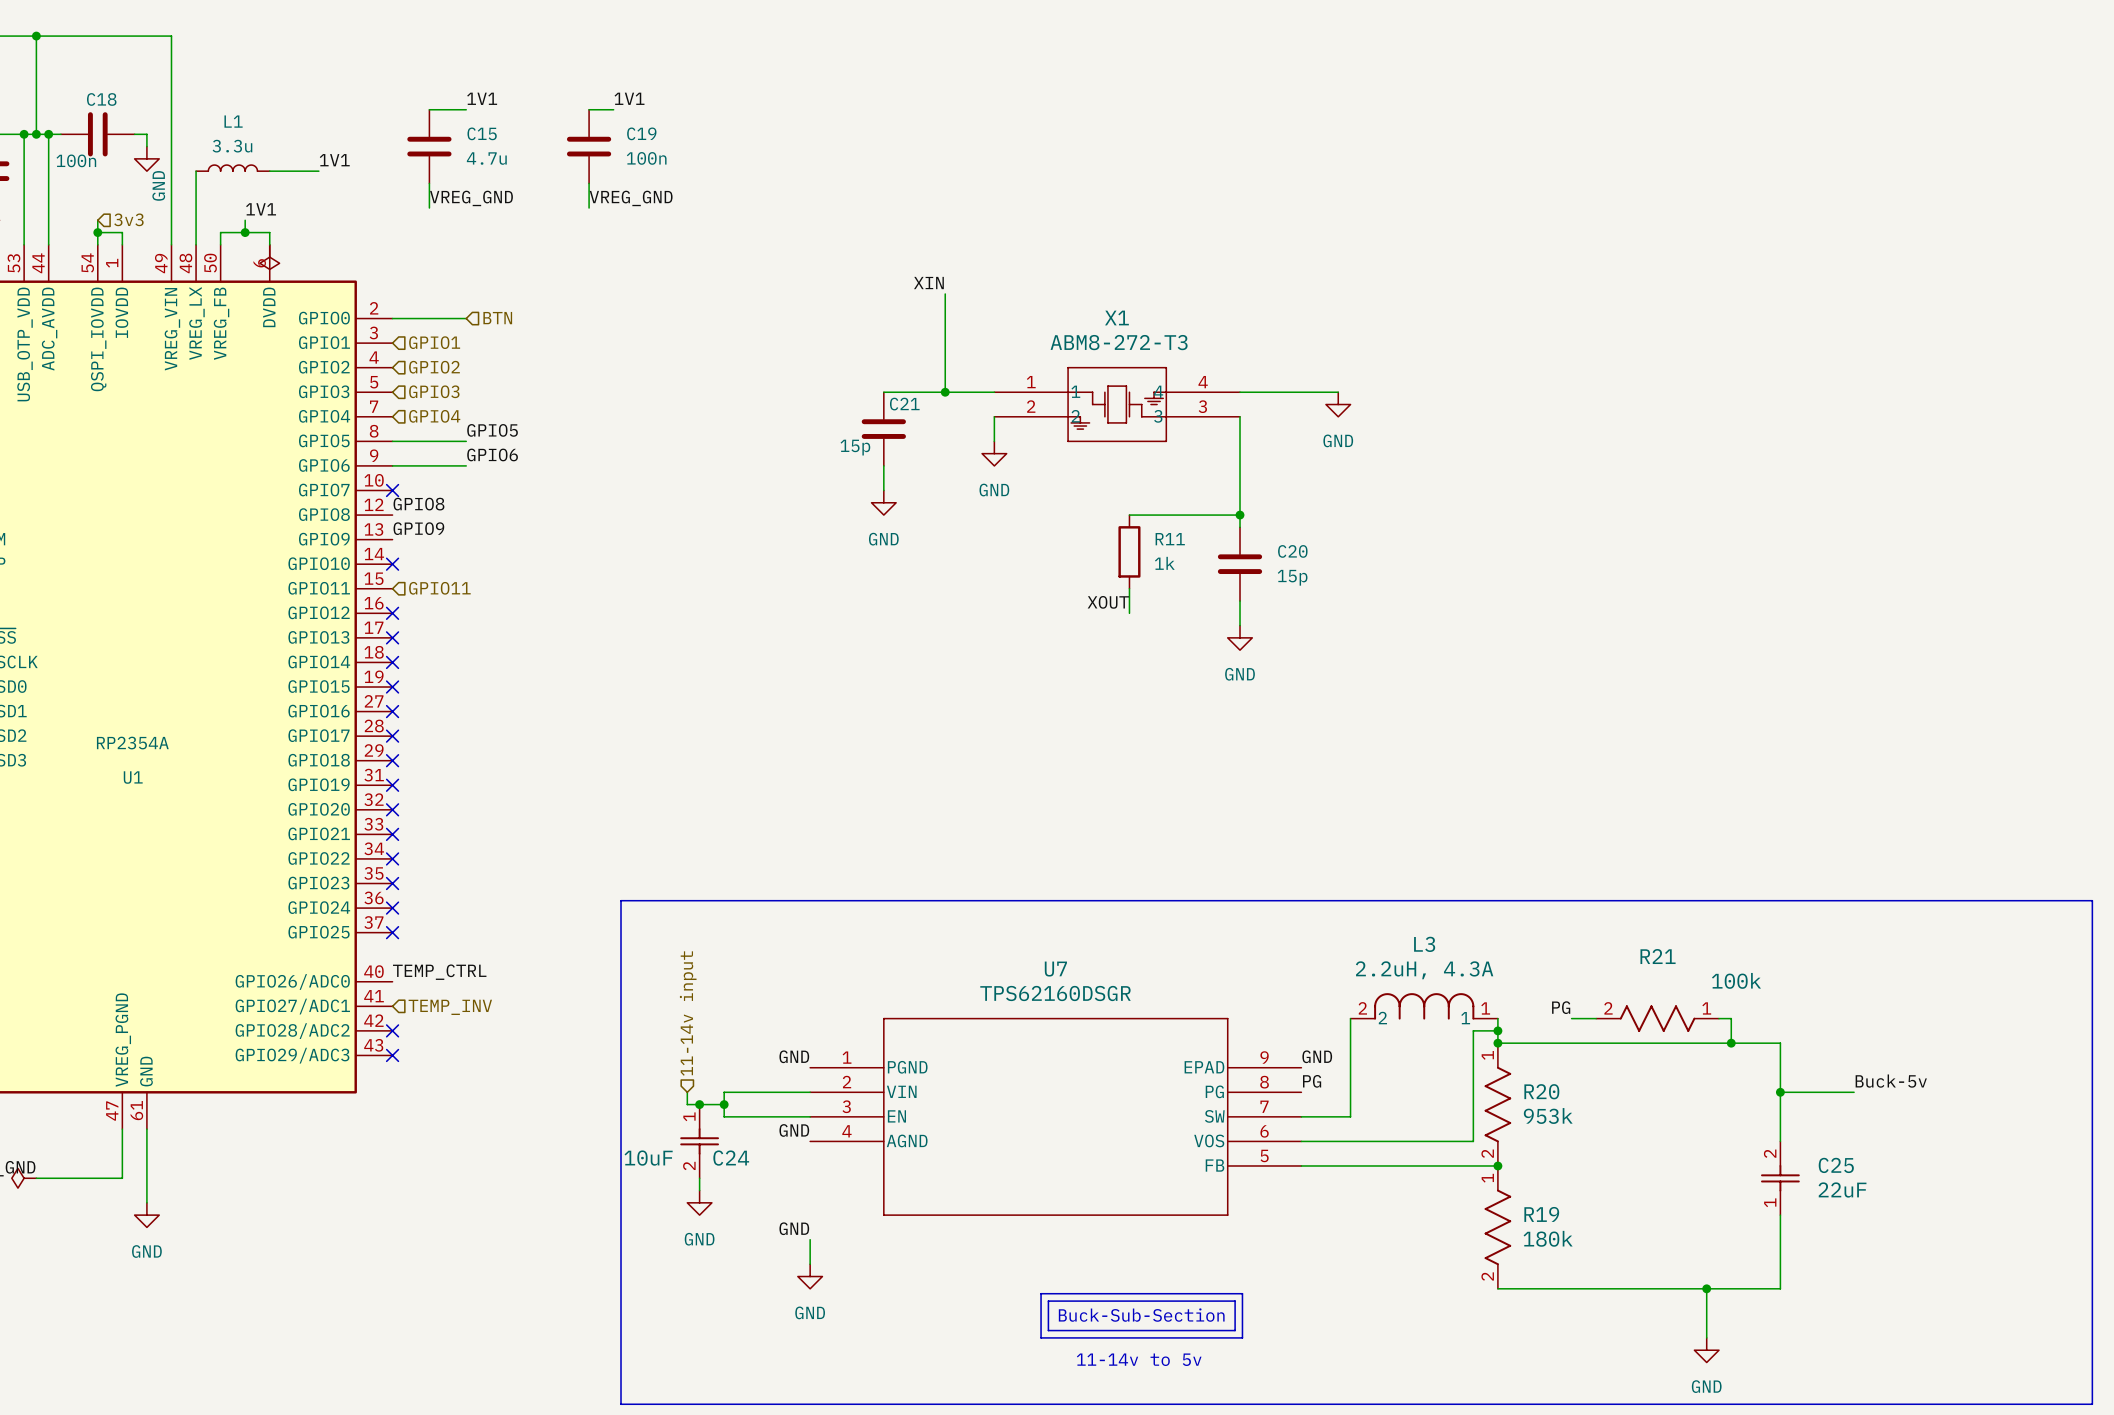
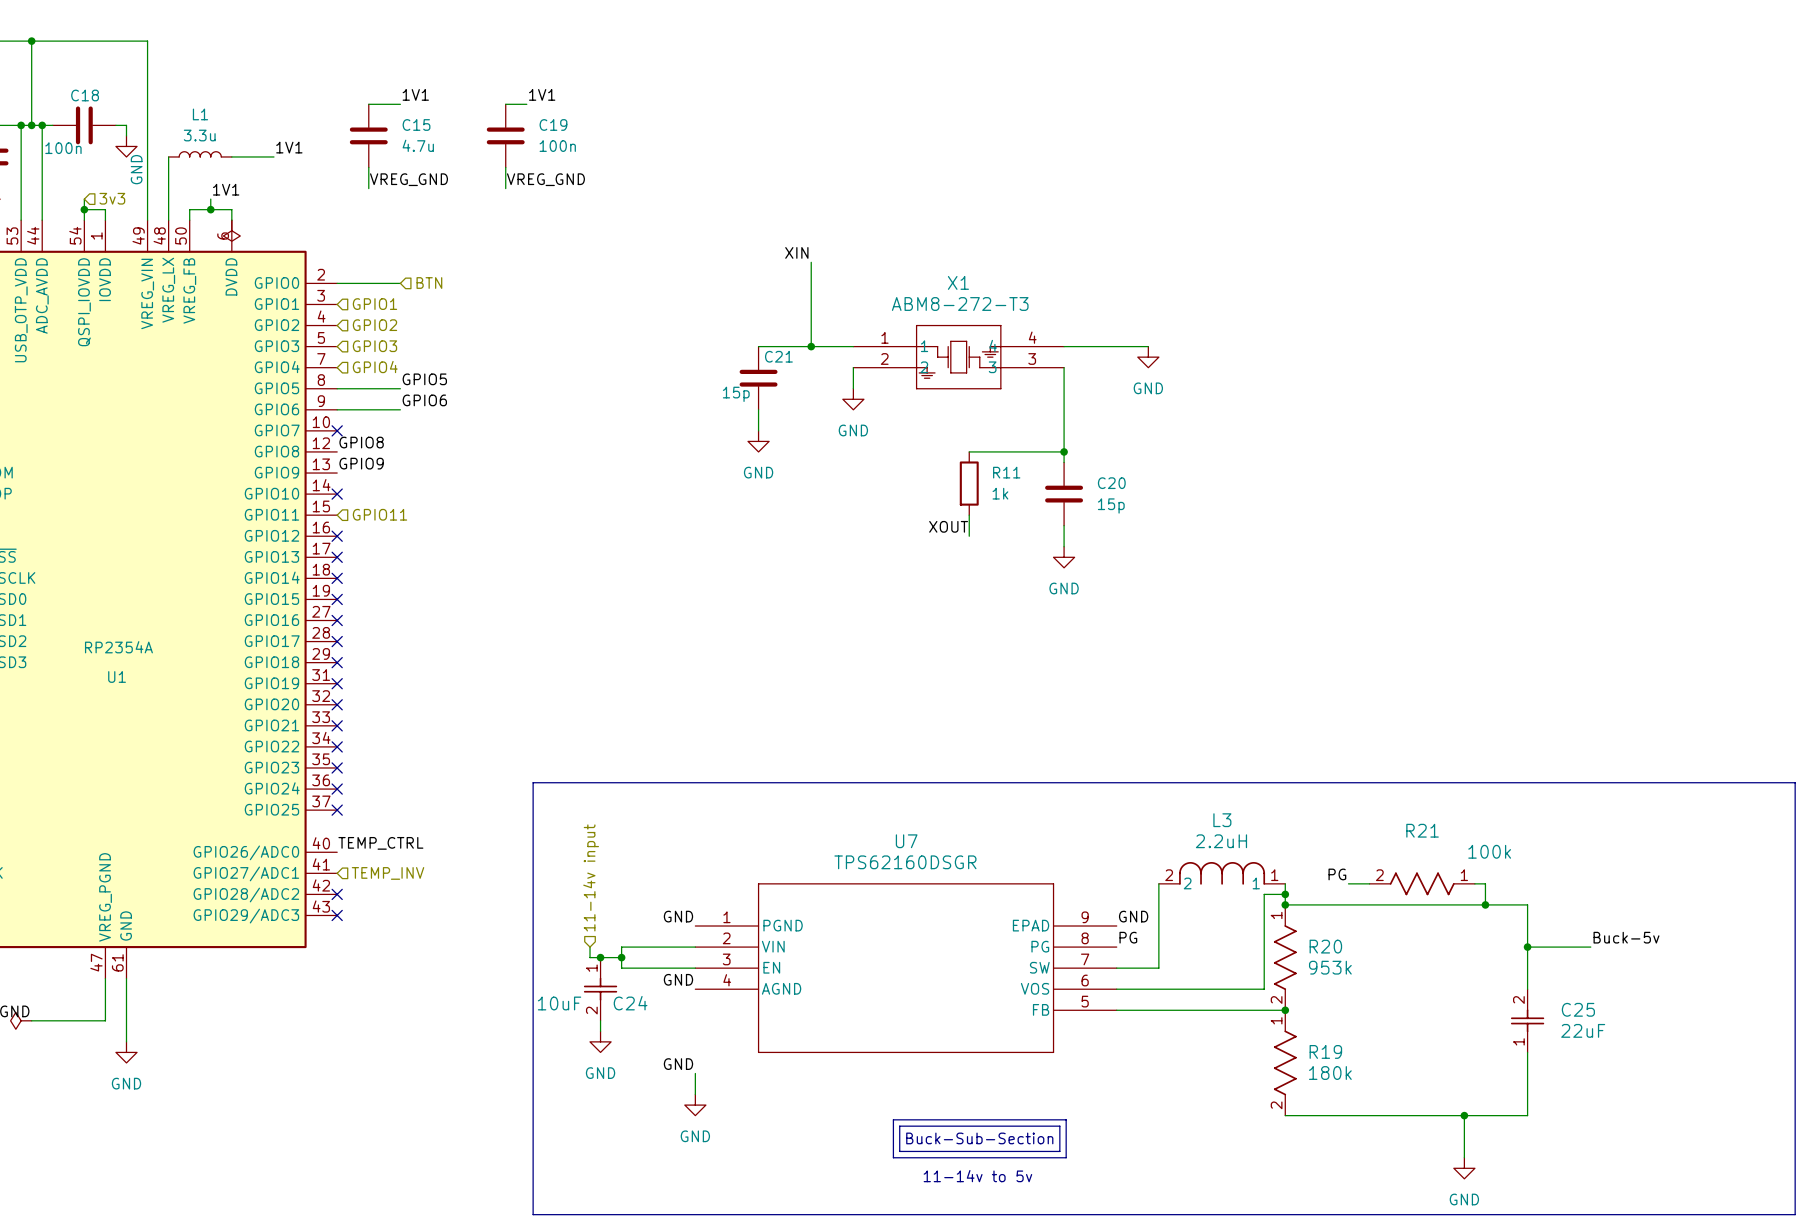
L3 value: 2.2uH, 4.3A (1424, 970) -> 2.2uH (1221, 841)

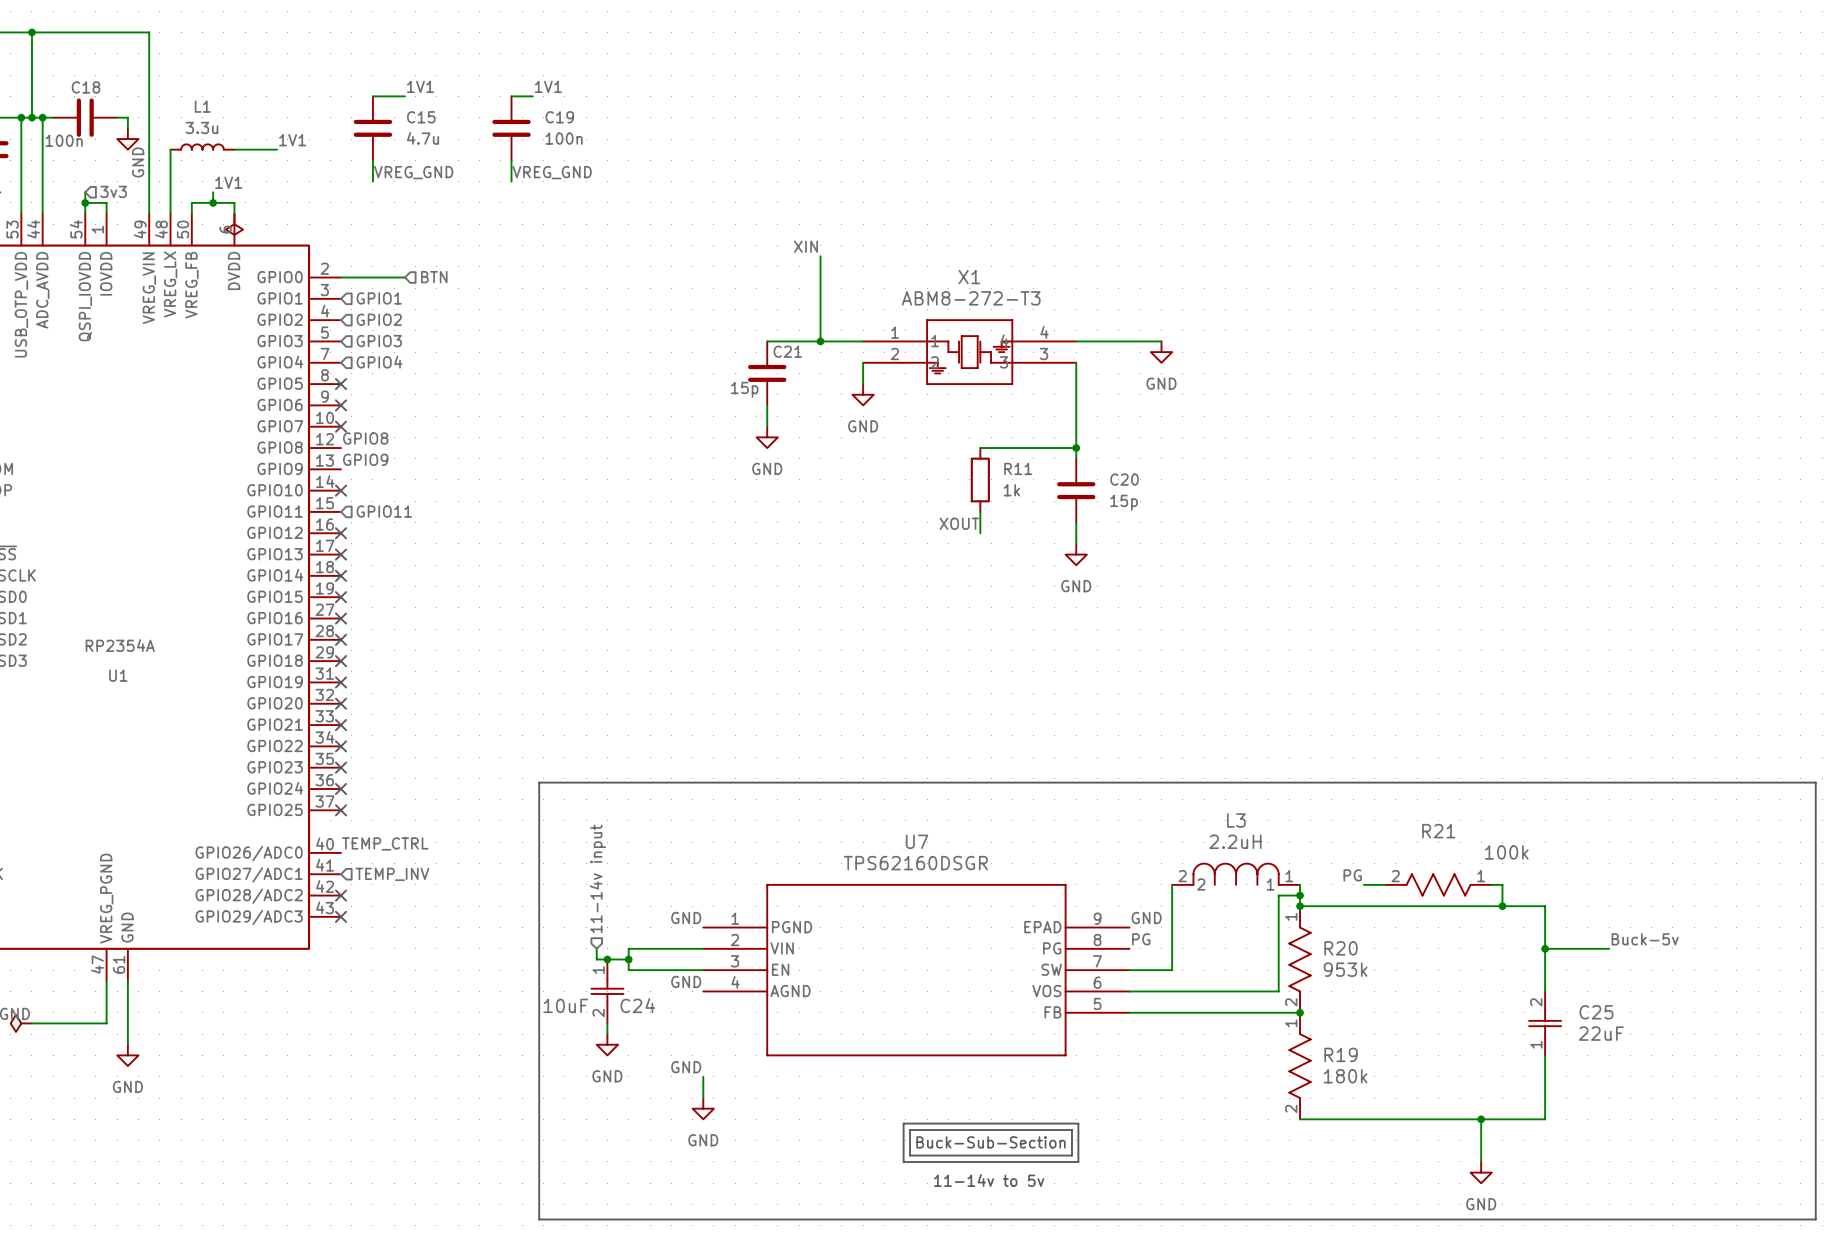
label: GPIO5 (424, 379) -> none
wire: (337, 388) (400, 388) -> none
no-connect mark: none -> (341, 384)
label: GPIO6 (424, 400) -> none
wire: (337, 409) (400, 409) -> none
no-connect mark: none -> (341, 405)

